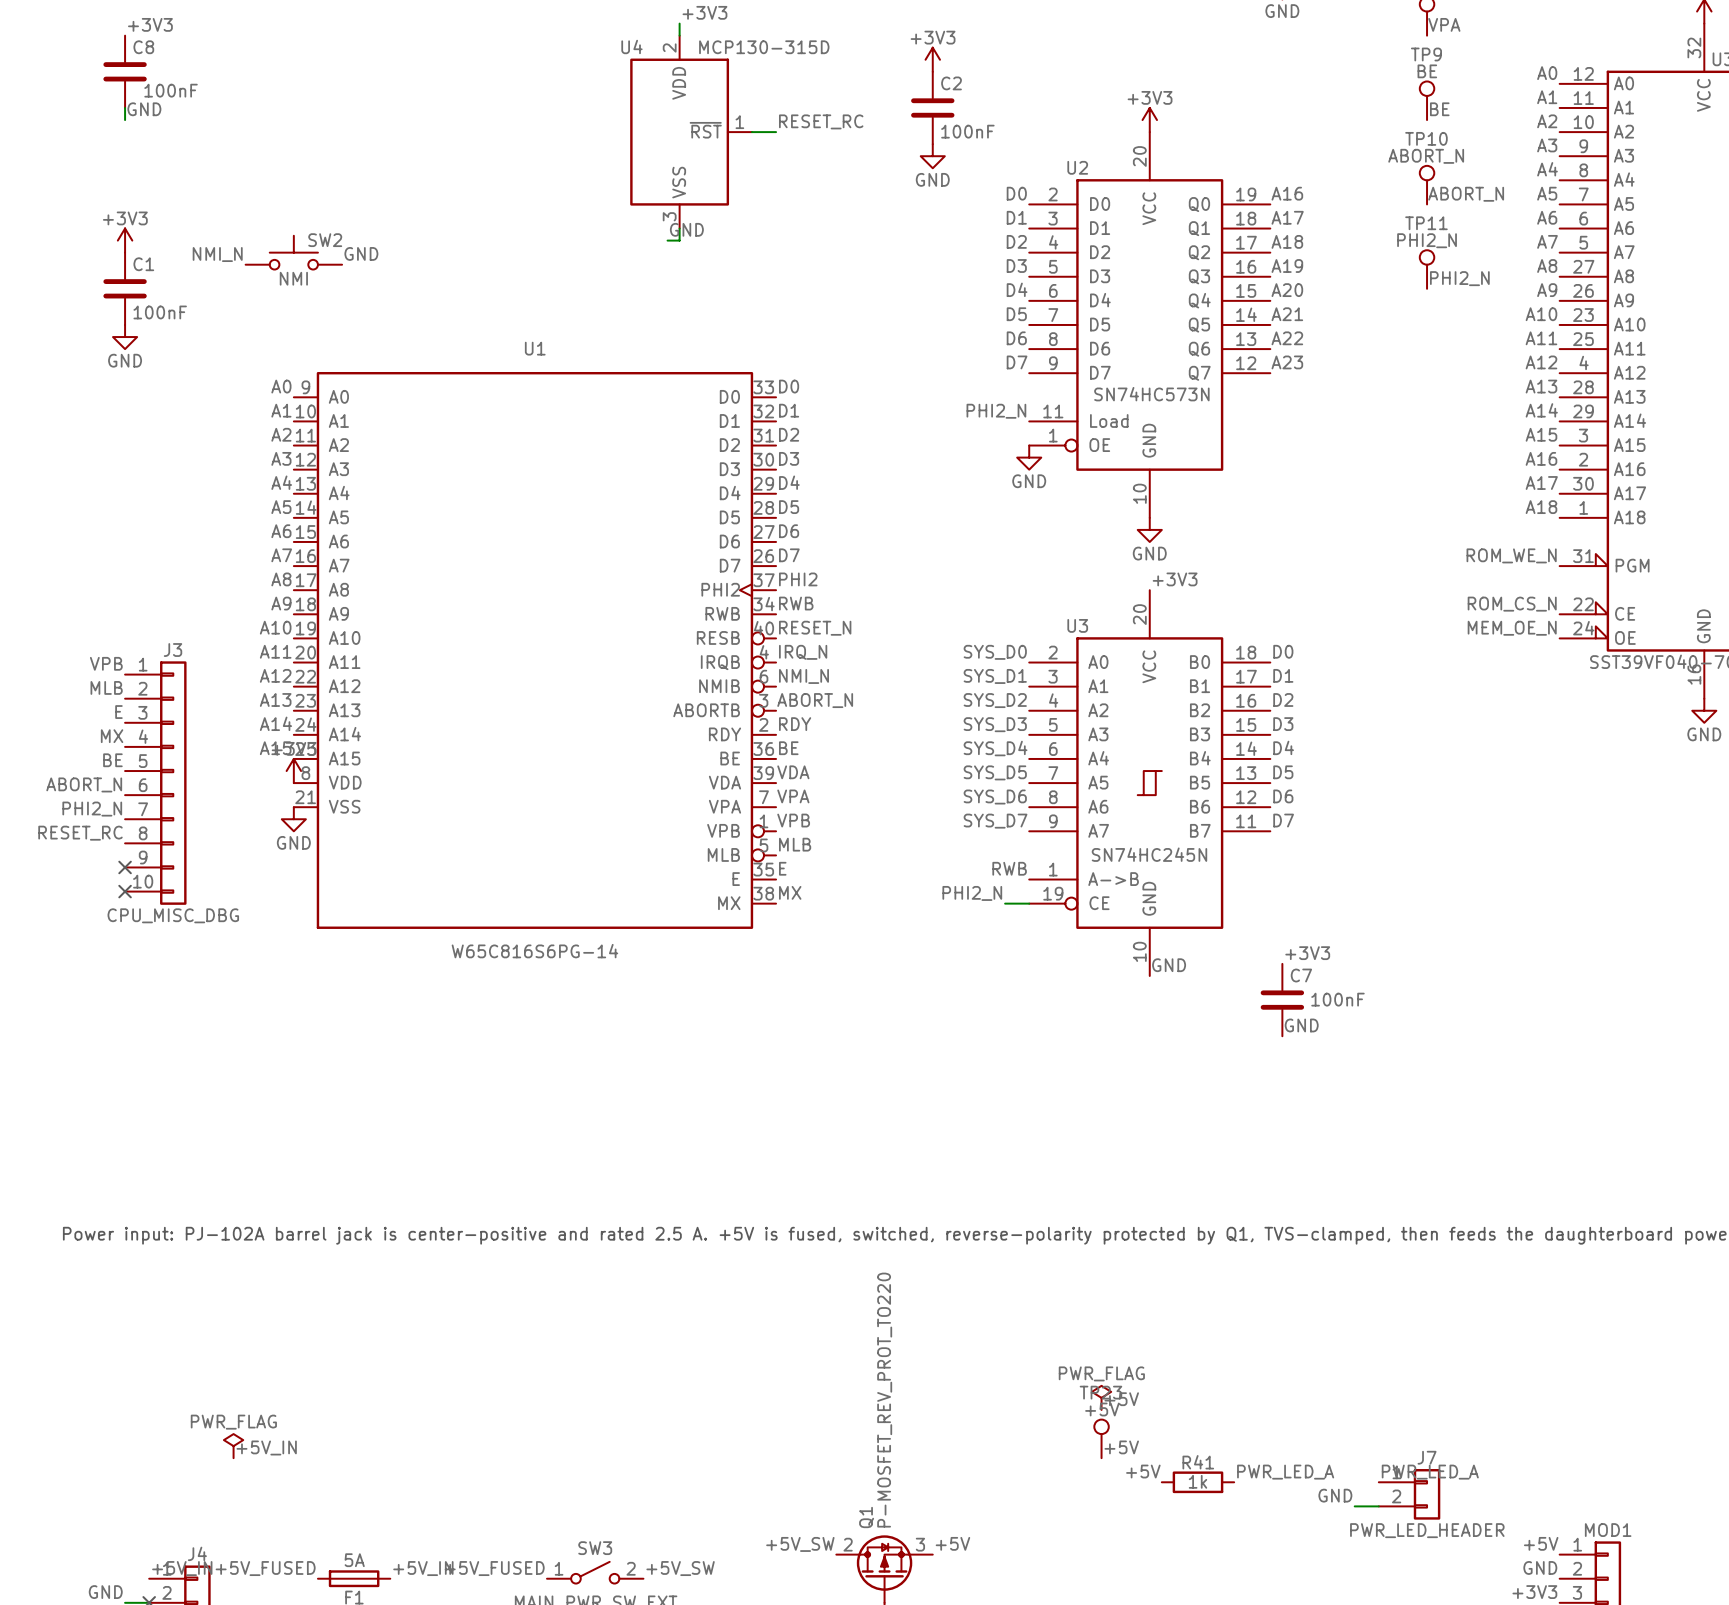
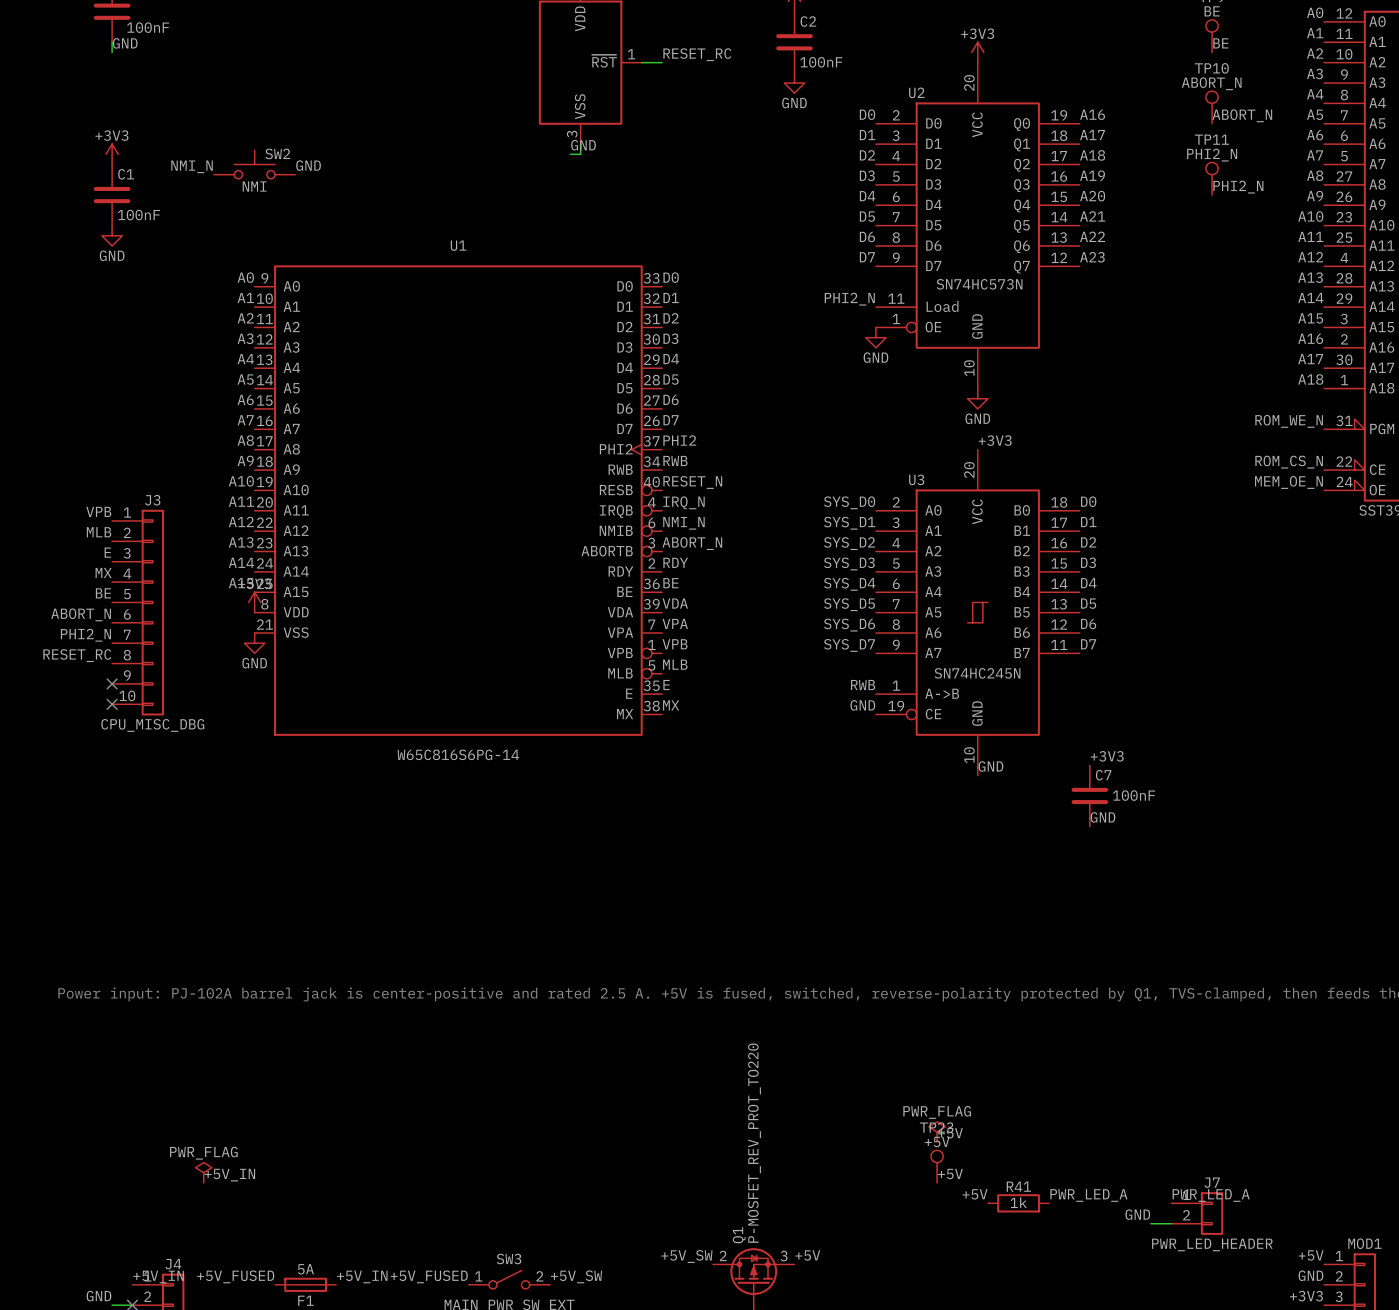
label: none -> GND (862, 705)
label: PHI2_N (972, 893) -> none
wire: (1005, 903) (1029, 903) -> none

